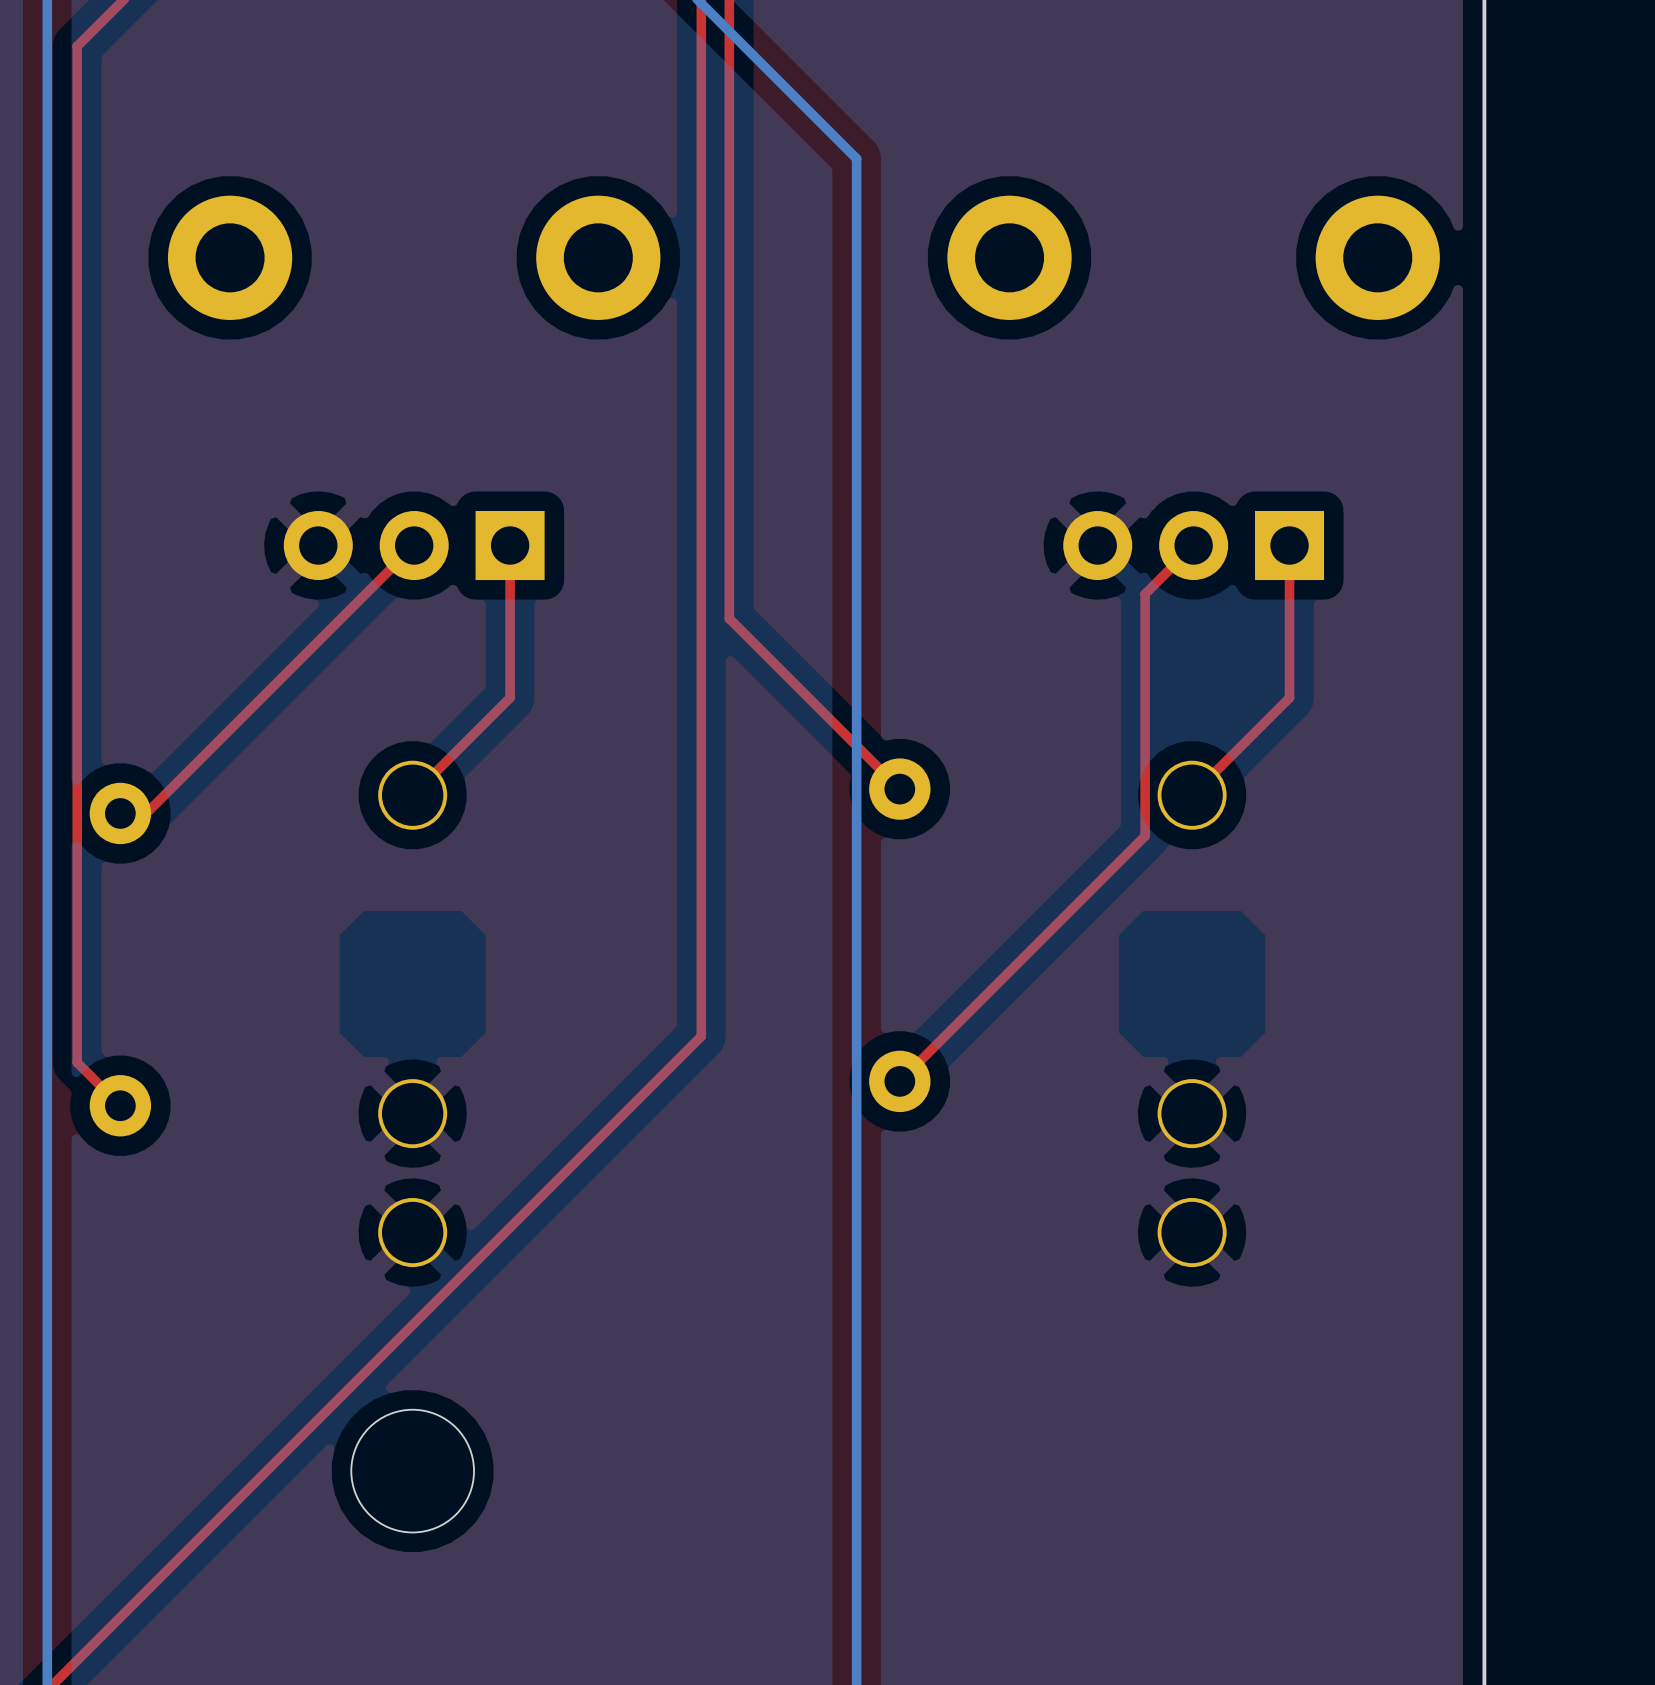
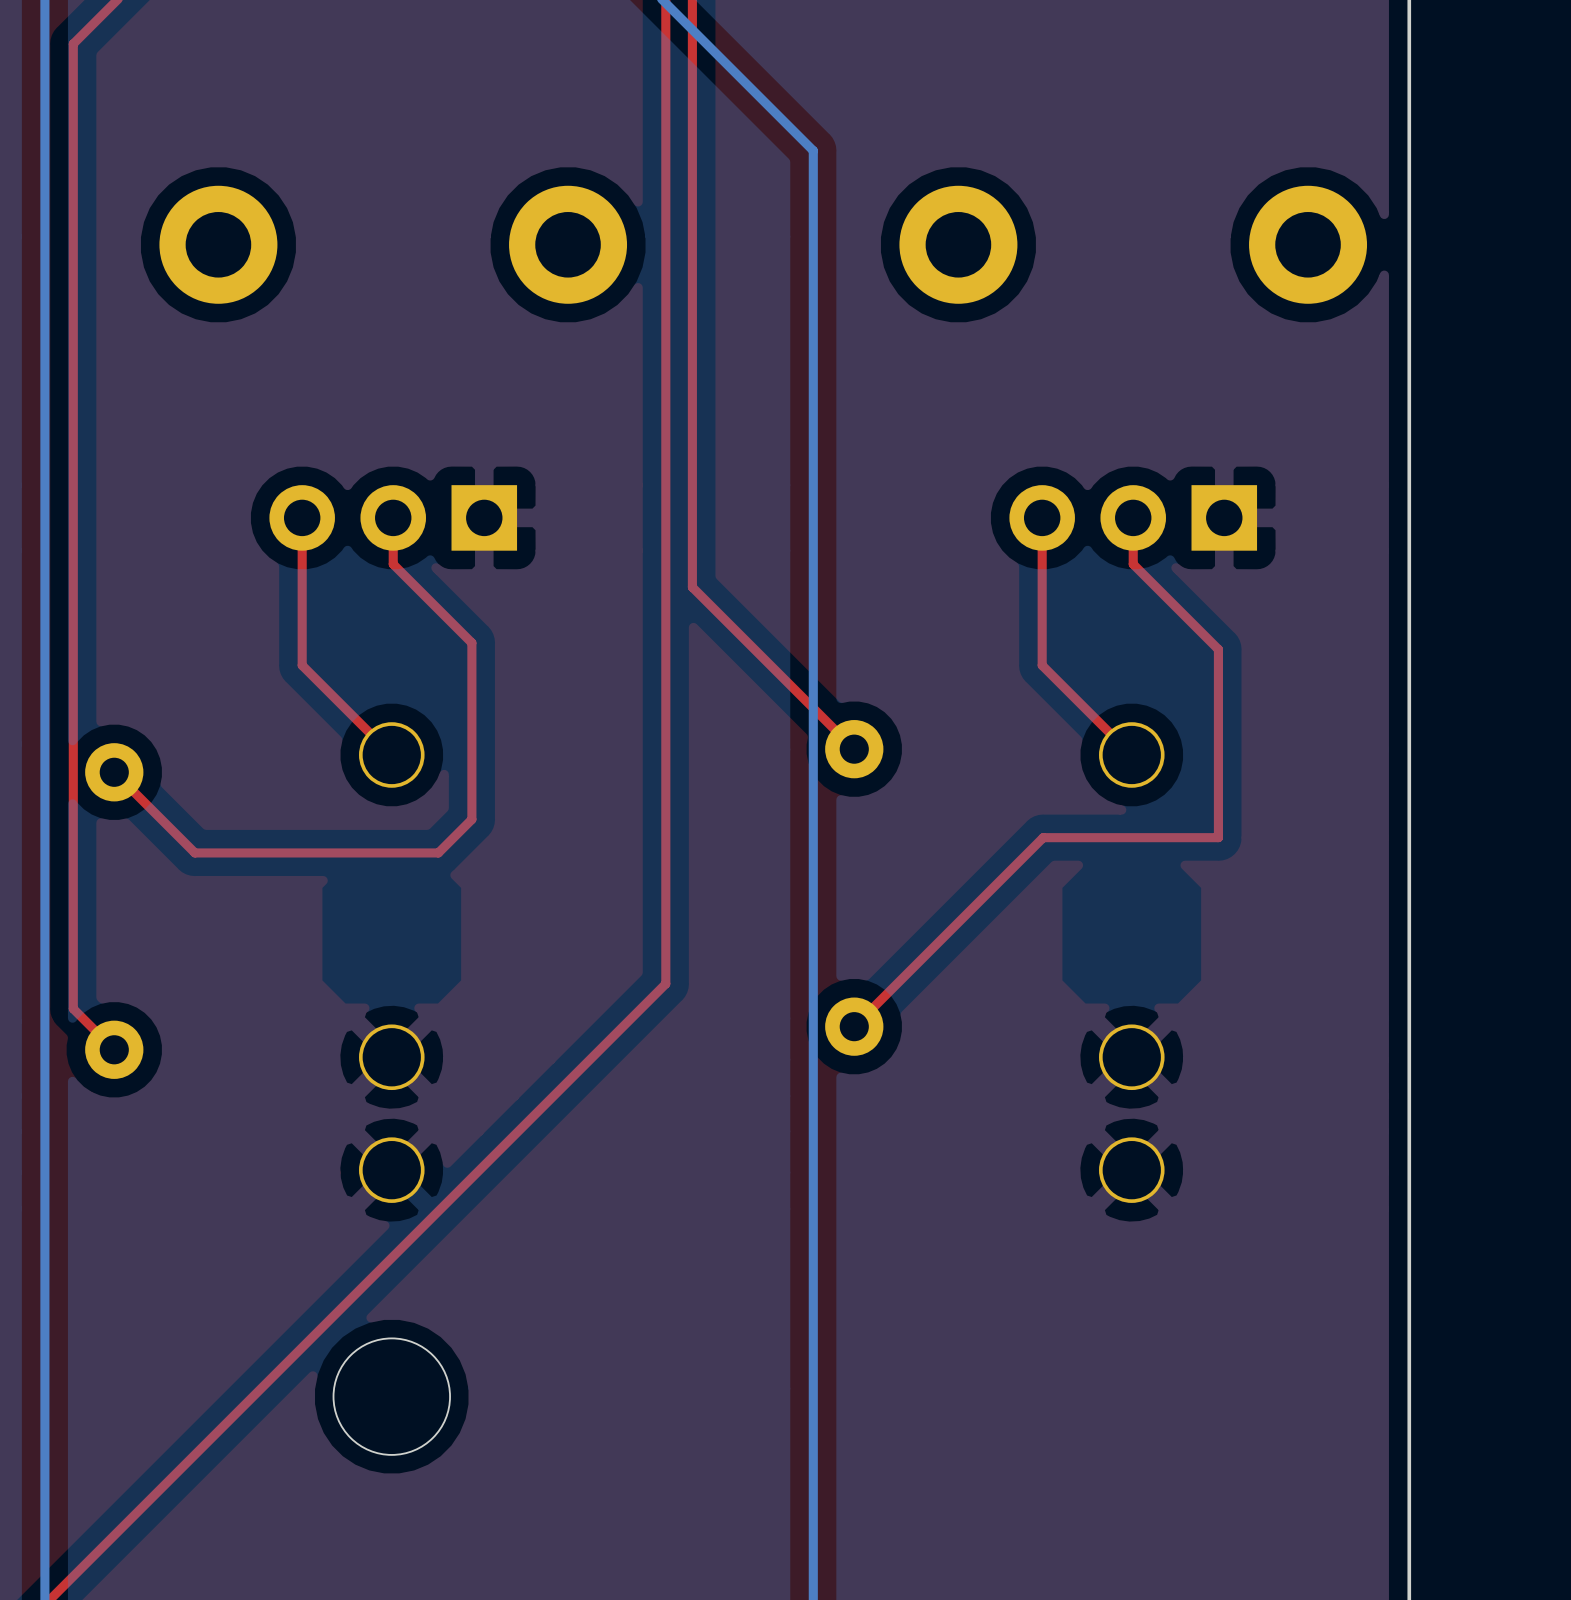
top track: (414, 545) (146, 813) (120, 813) -> (393, 517) (393, 564) (471, 642) (471, 819) (438, 852) (194, 852) (114, 772)
top track: (510, 545) (510, 697) (412, 795) -> (302, 517) (302, 665) (391, 754)
top track: (1193, 545) (1145, 594) (1145, 836) (1098, 882) -> (1133, 517) (1133, 564) (1218, 649) (1218, 837) (1043, 837)
top track: (1289, 545) (1289, 697) (1192, 795) -> (1042, 517) (1042, 665) (1131, 754)

